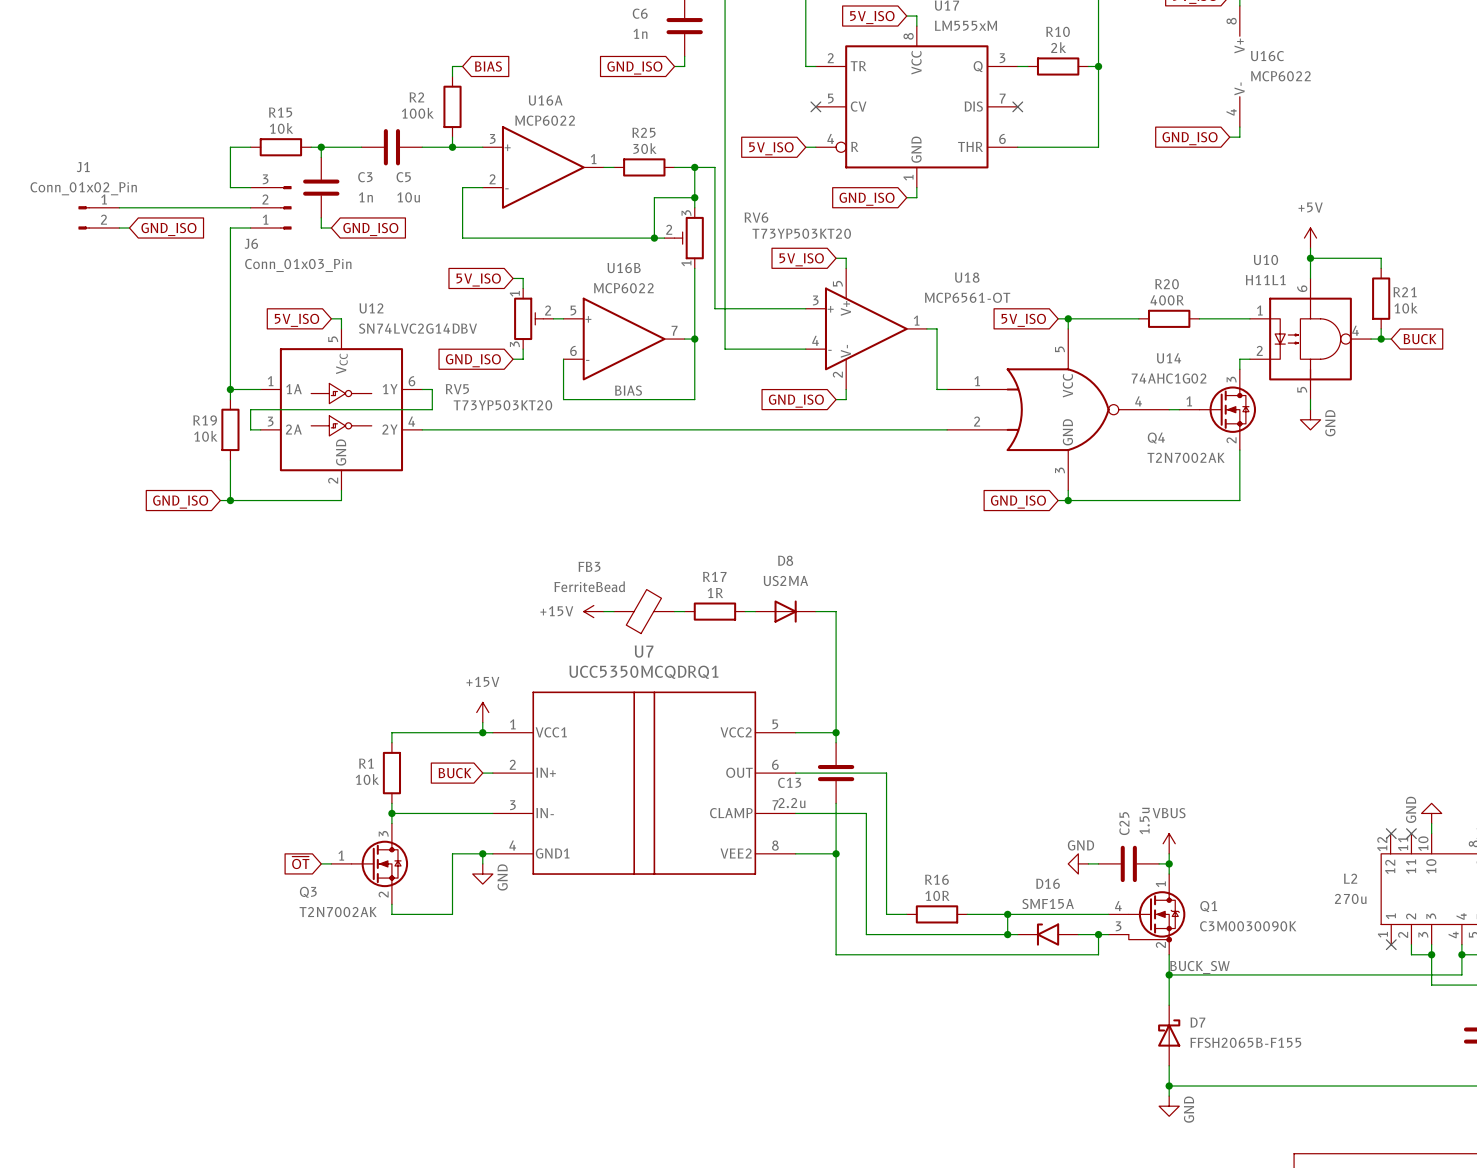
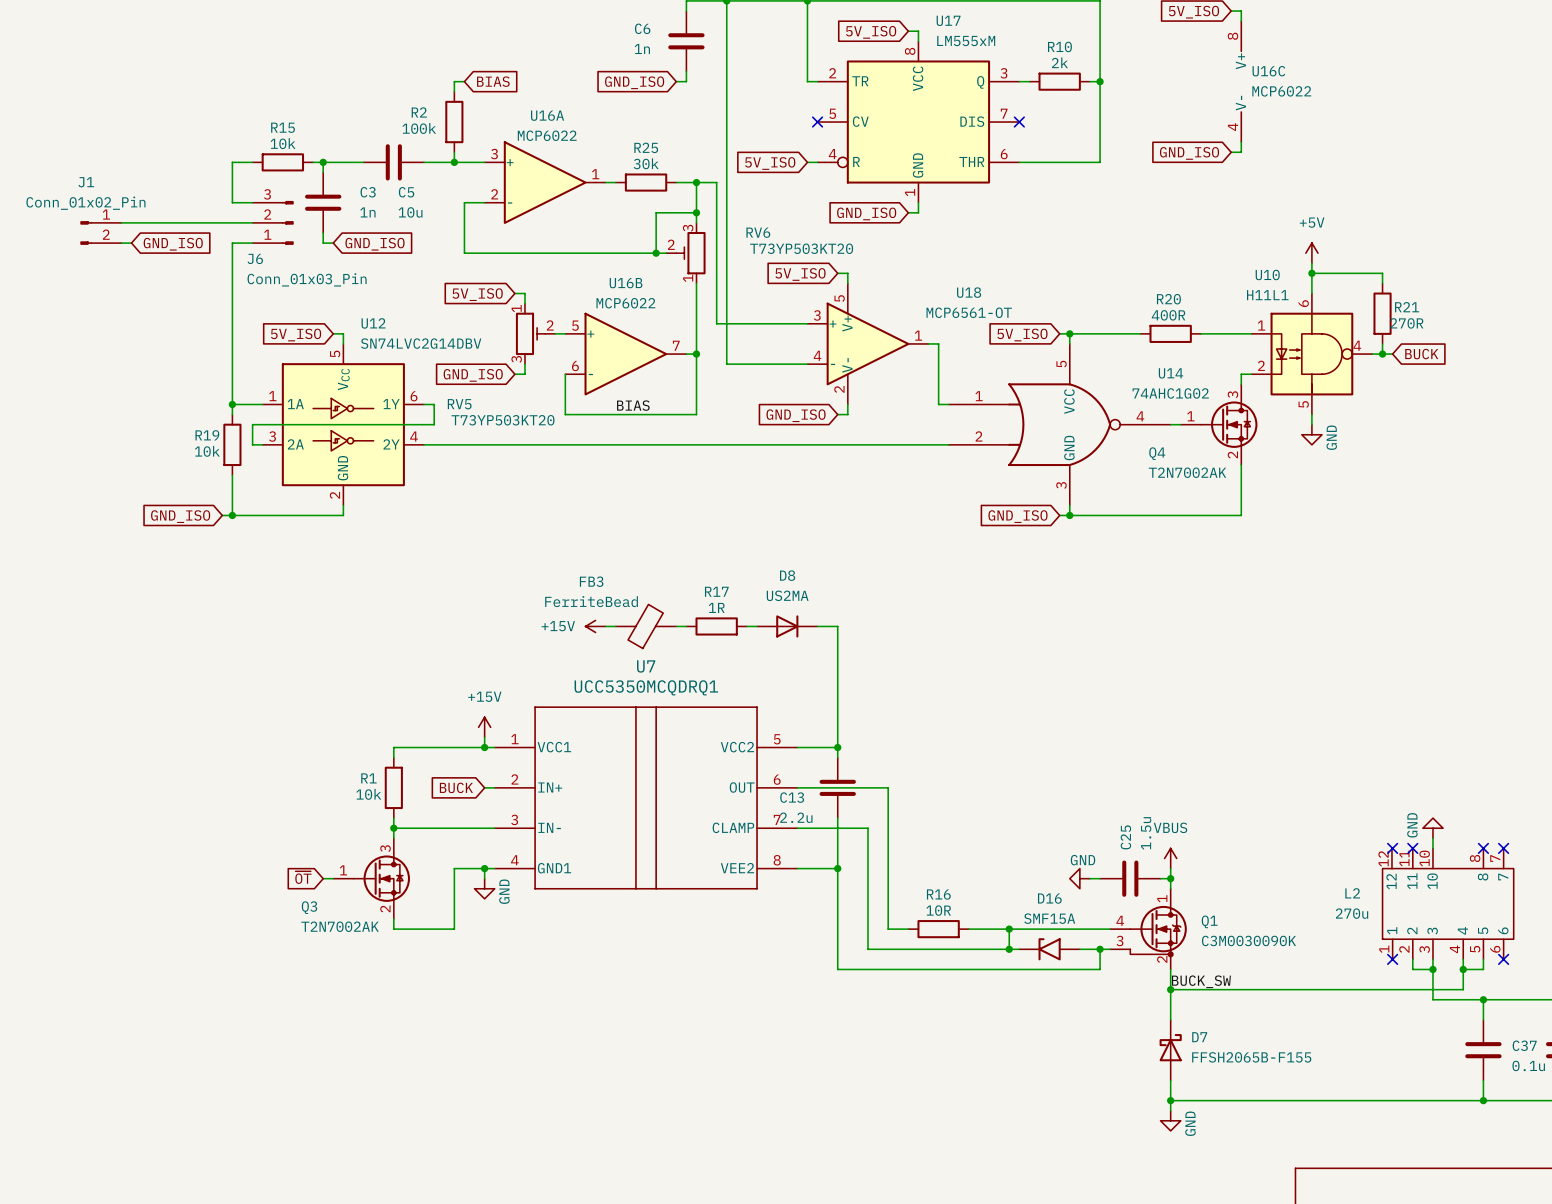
R21 value: 10k (1406, 308) -> 270R (1406, 323)

